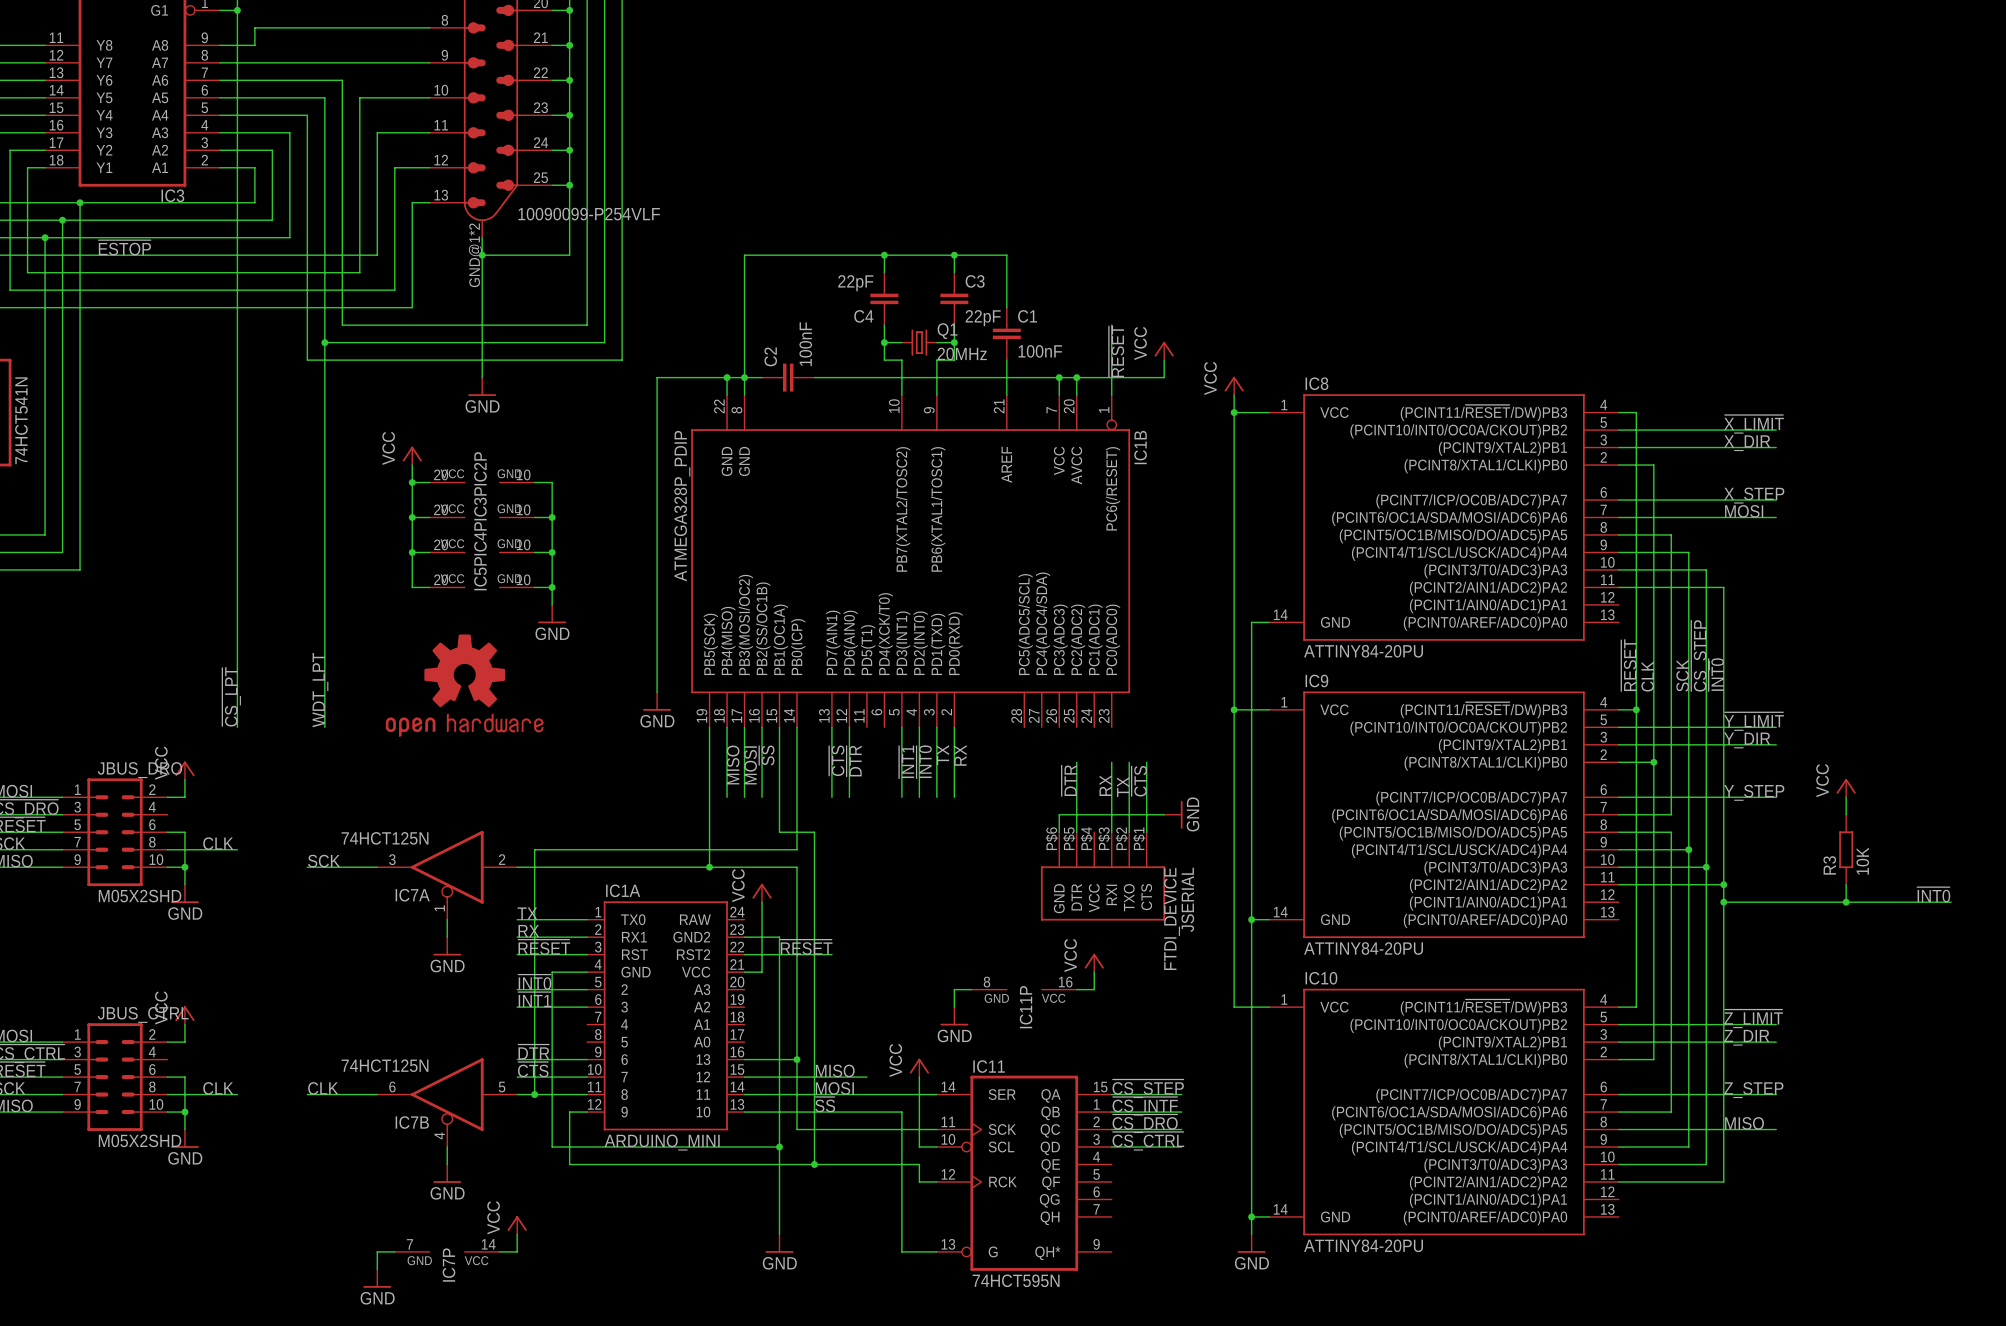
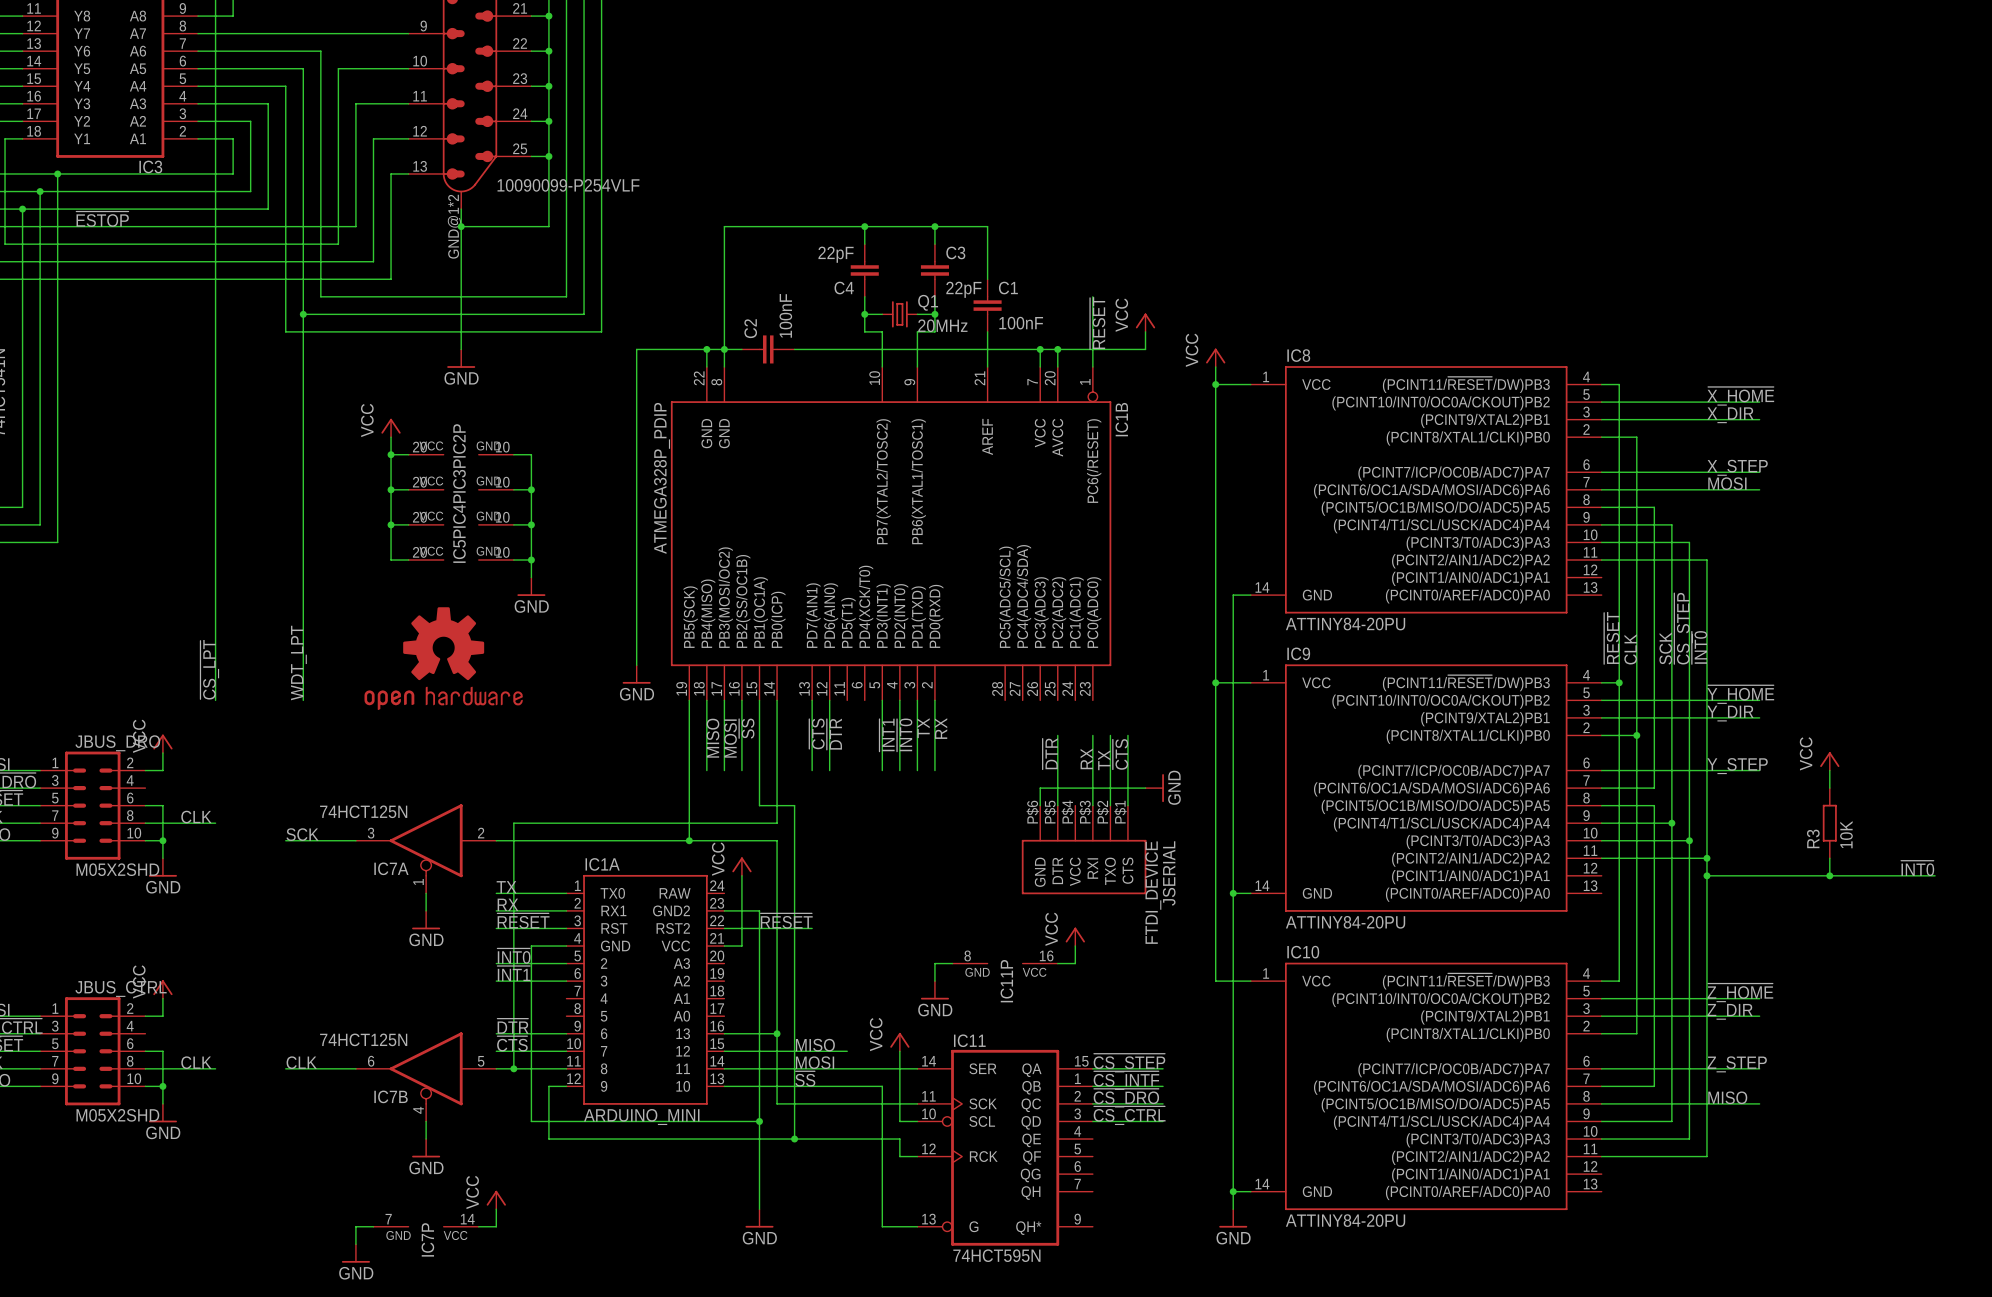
label: ~{X_LIMIT} (1754, 424) -> ~{X_HOME} (1740, 396)
label: ~{Y_LIMIT} (1754, 721) -> ~{Y_HOME} (1740, 694)
label: ~{Z_LIMIT} (1753, 1018) -> ~{Z_HOME} (1740, 992)

